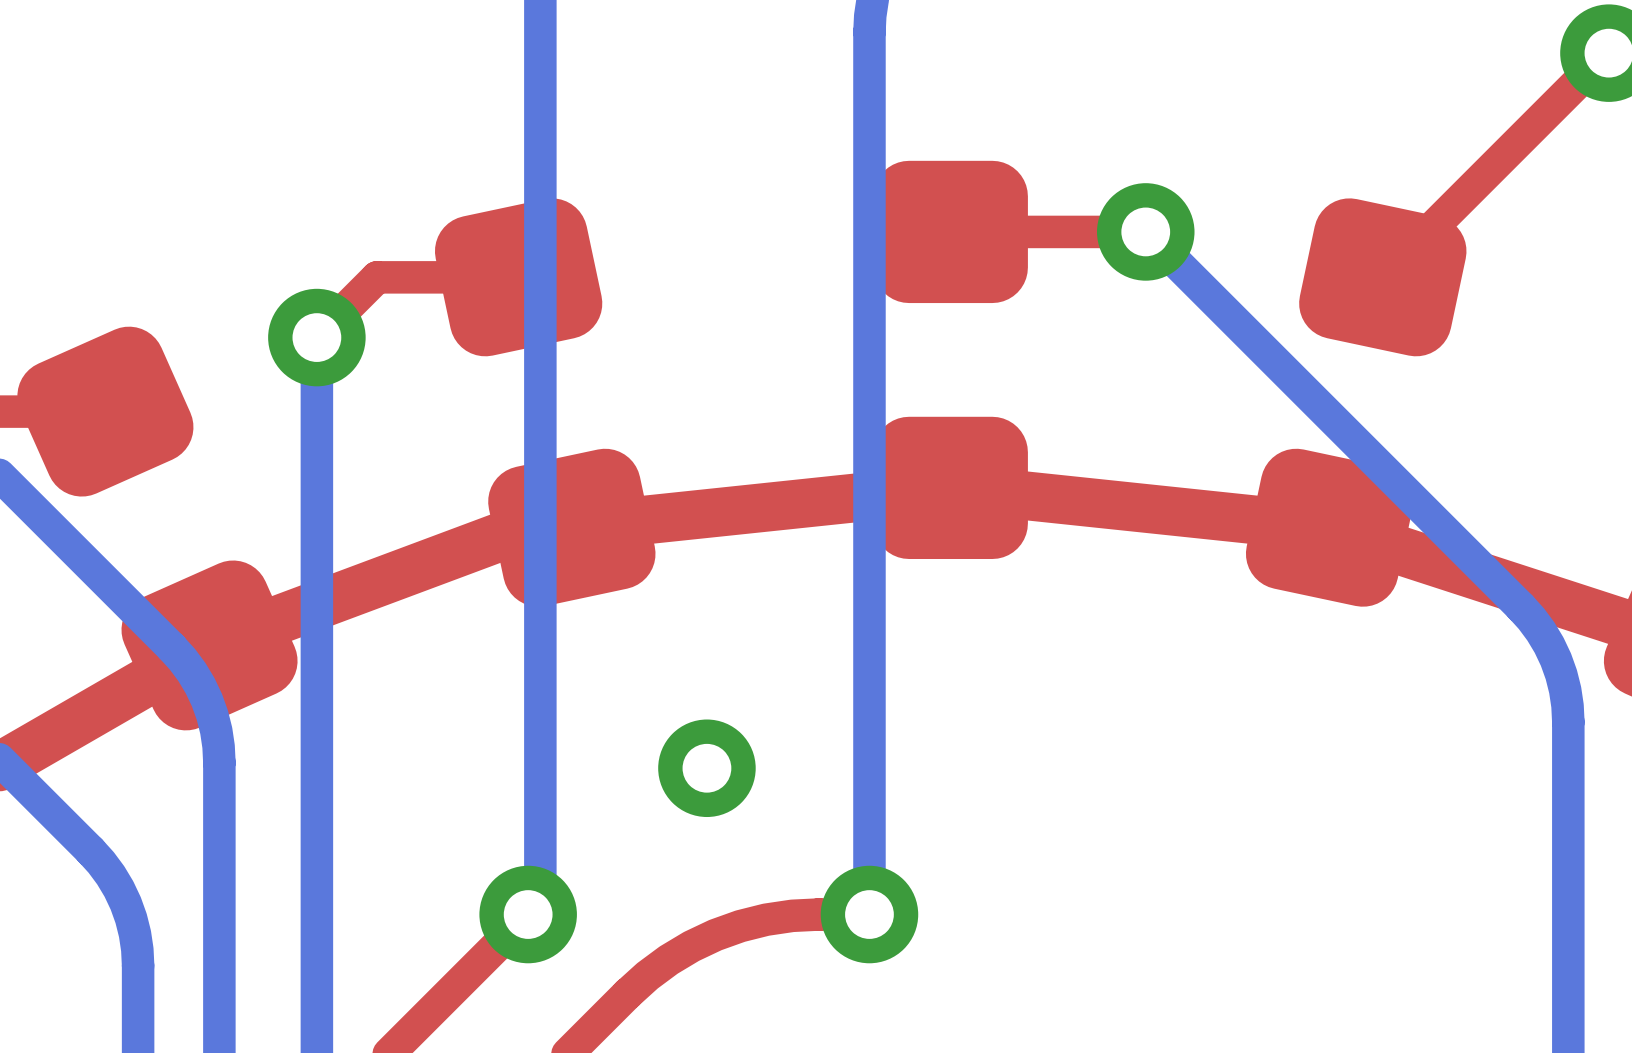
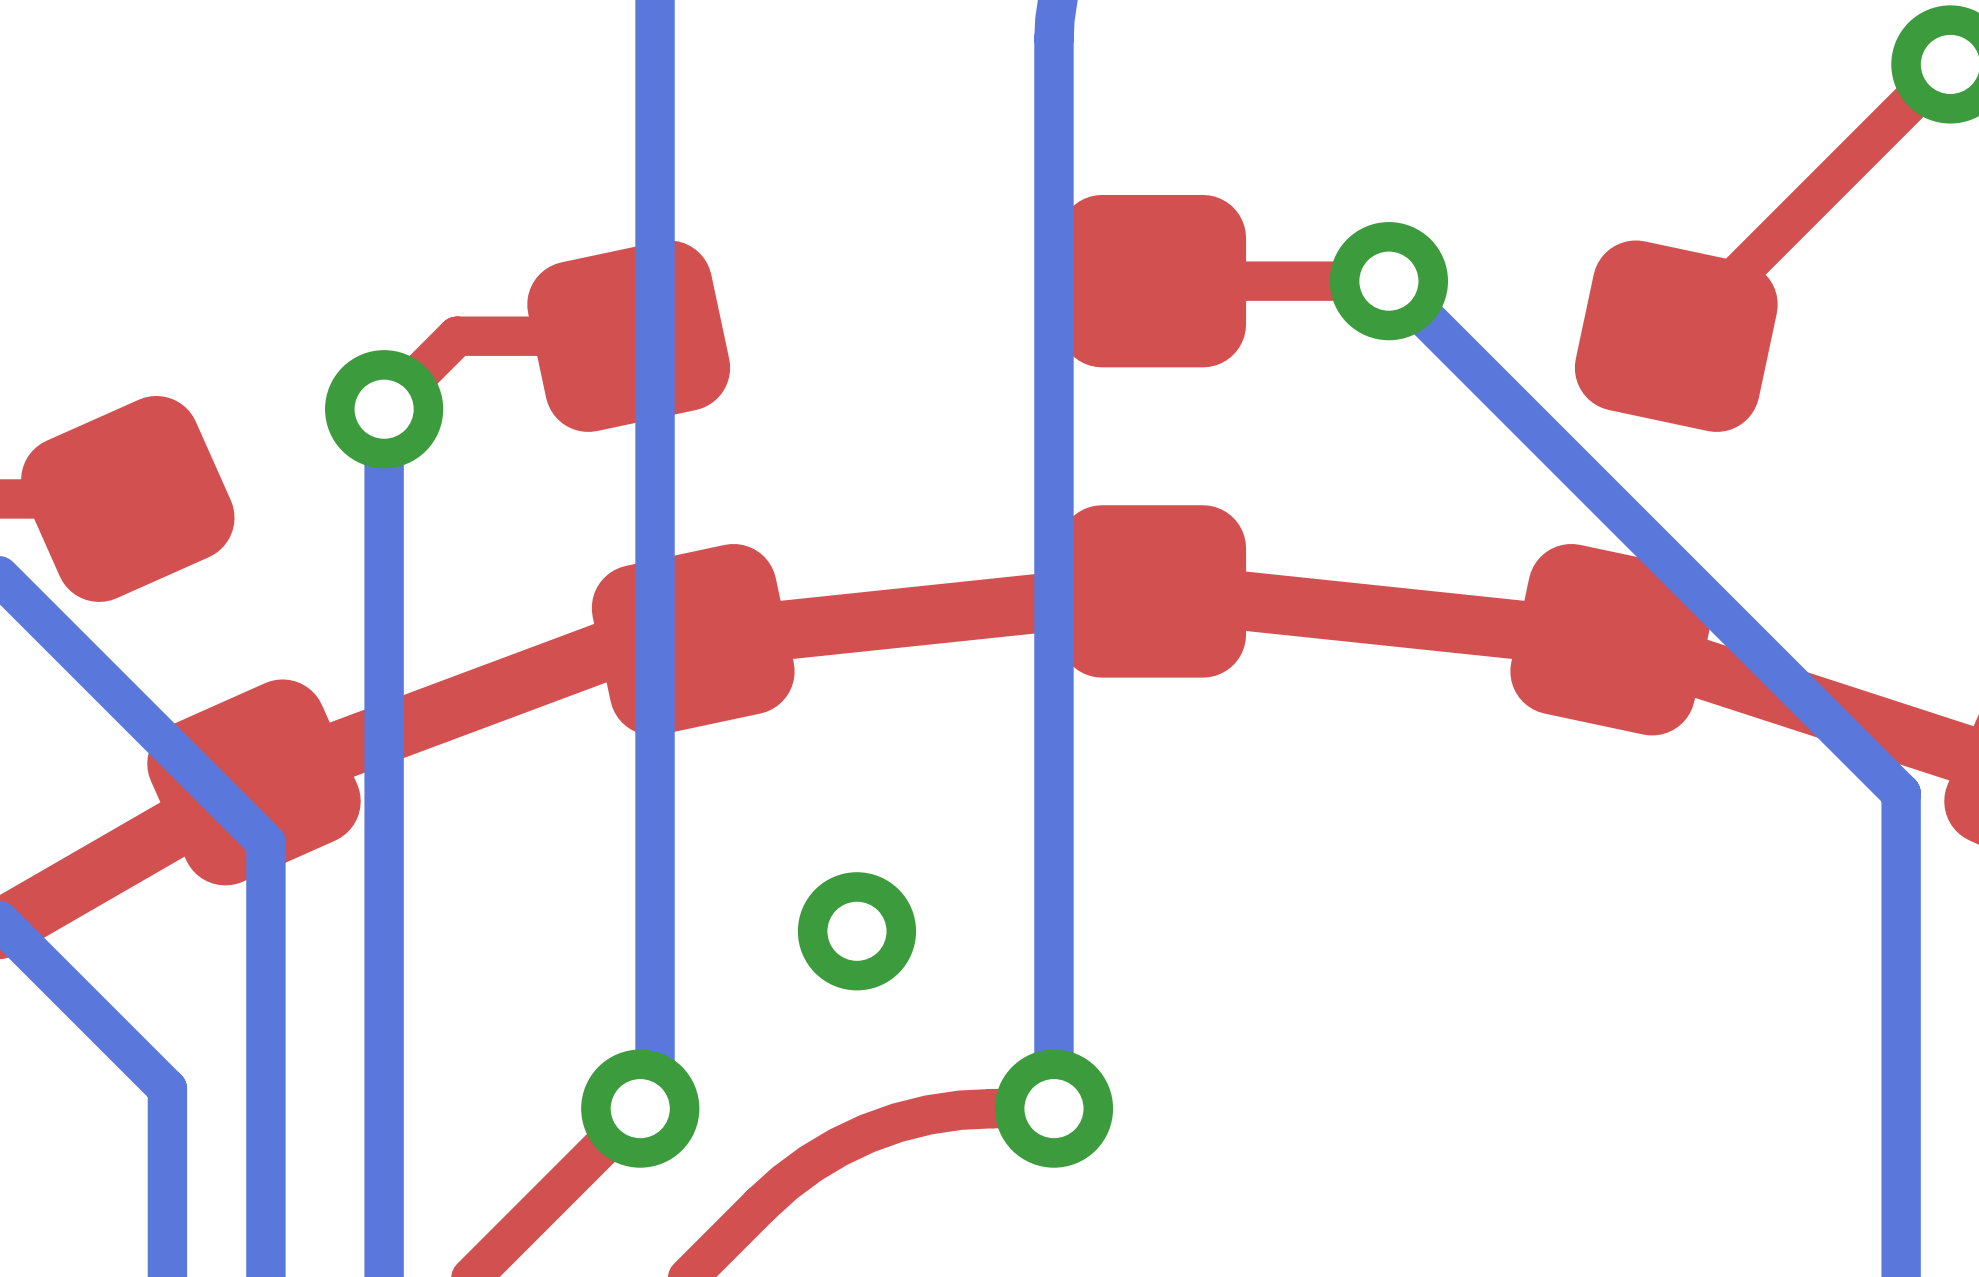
bottom track: (1520, 606) (1540, 631) (1555, 659) (1565, 690) (1568, 721) -> (1843, 735) (1901, 793) (1901, 874)
bottom track: (171, 647) (191, 672) (207, 700) (216, 730) (219, 762) -> (208, 784) (265, 842) (265, 924)
bottom track: (90, 850) (110, 875) (125, 903) (134, 933) (138, 965) -> (109, 1031) (167, 1088) (167, 1170)

